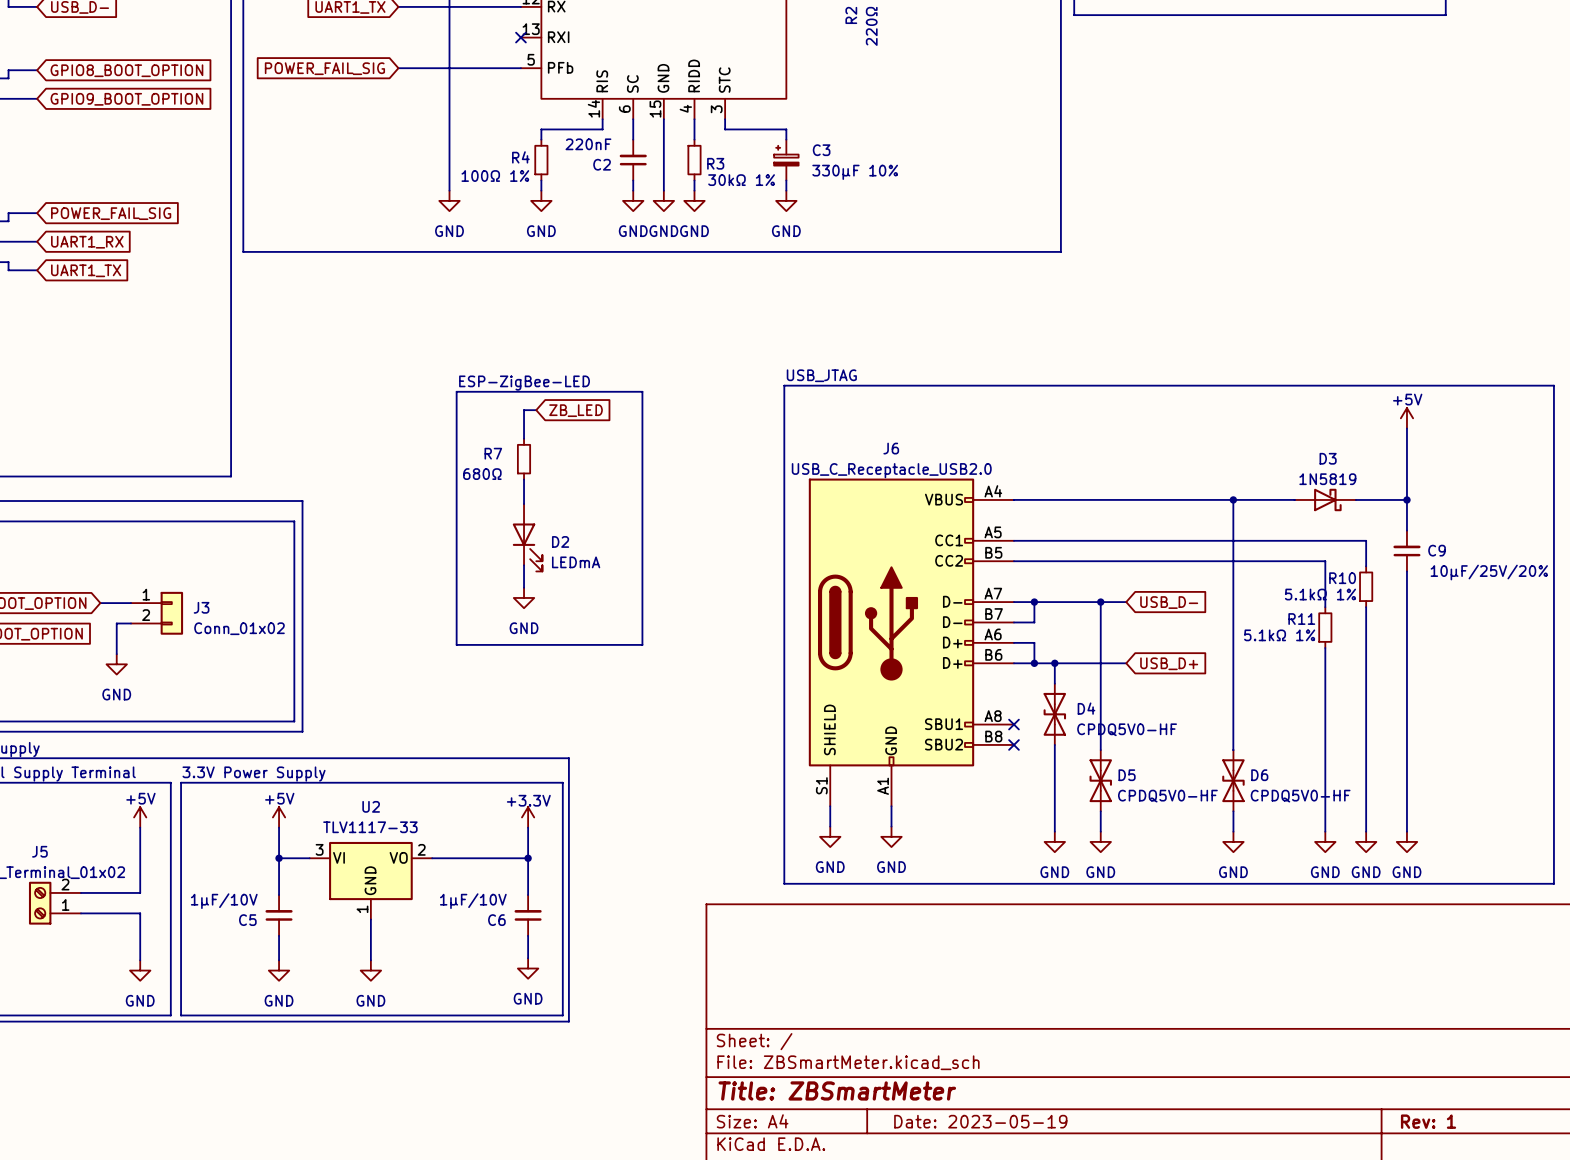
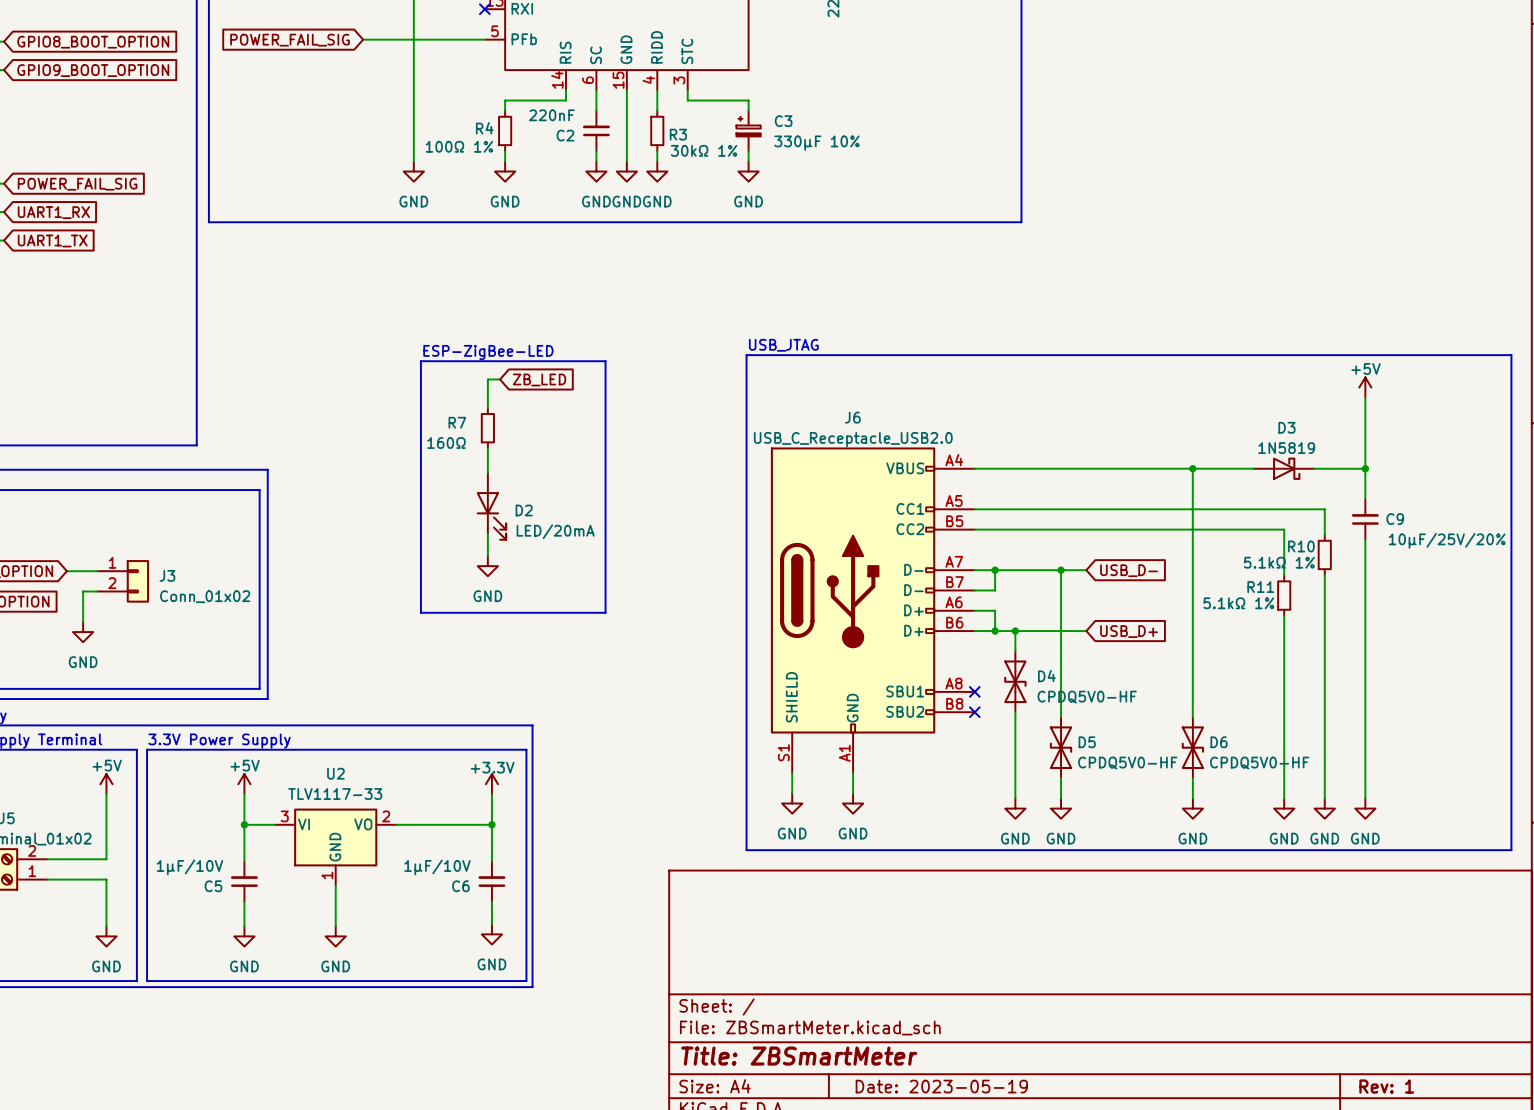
R7 value: 680Ω (482, 474) -> 160Ω (446, 443)
D2 value: LEDmA (576, 562) -> LED/20mA (555, 531)

